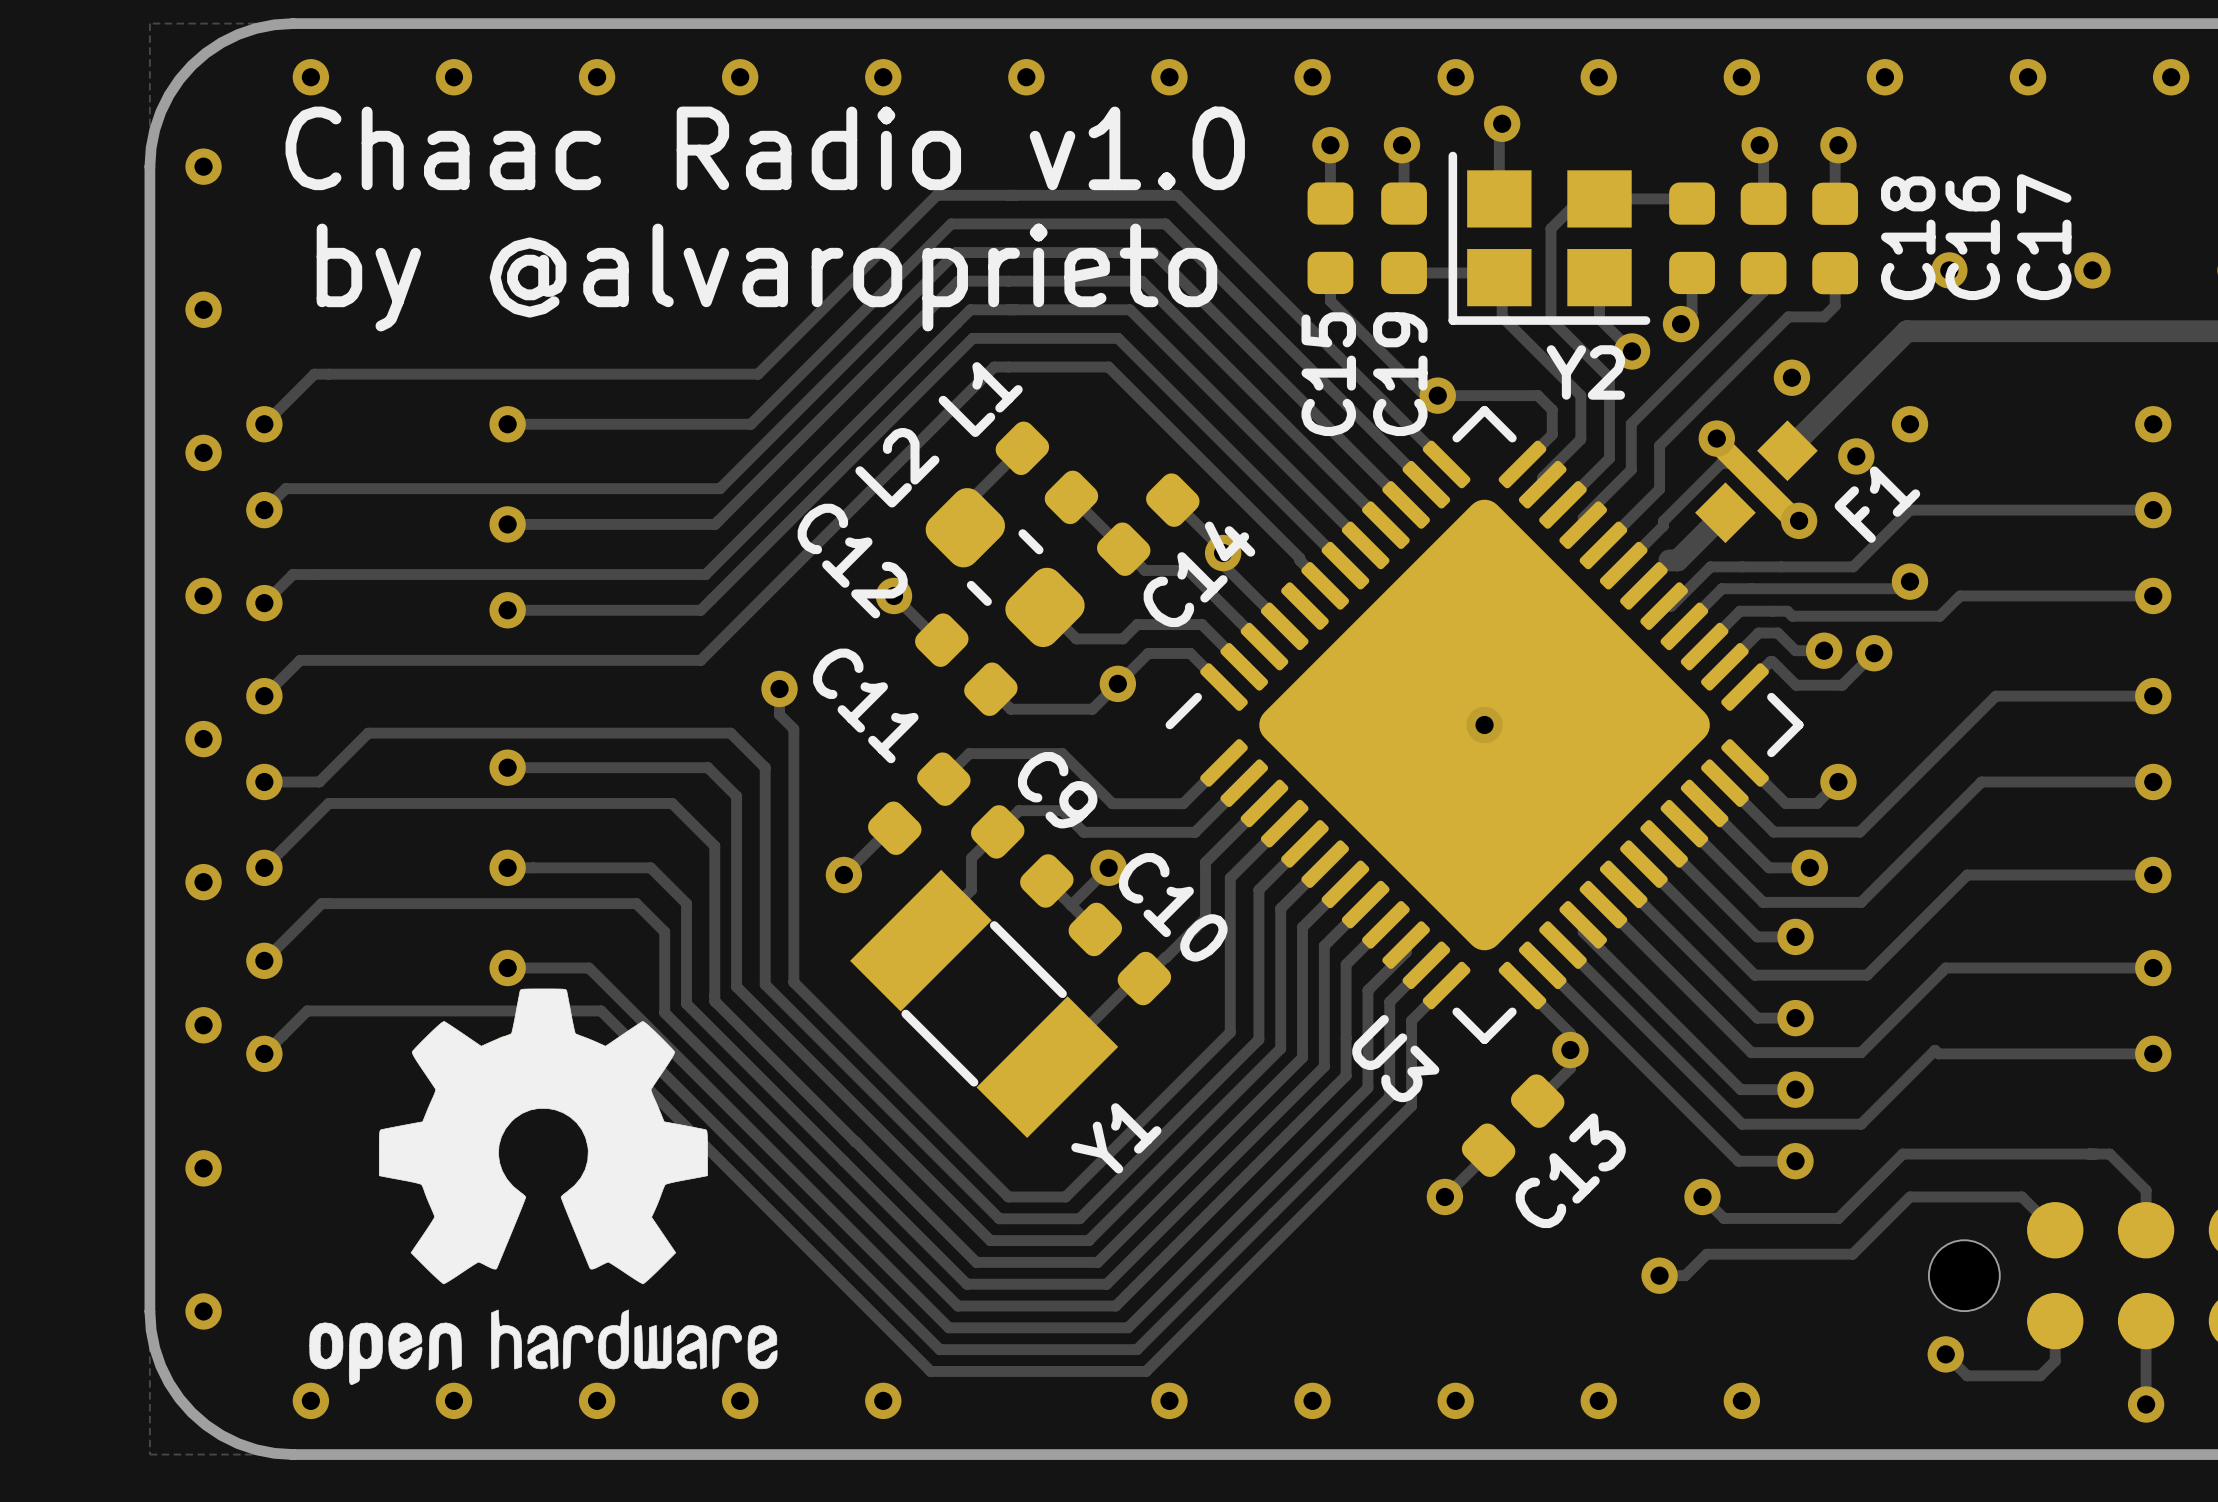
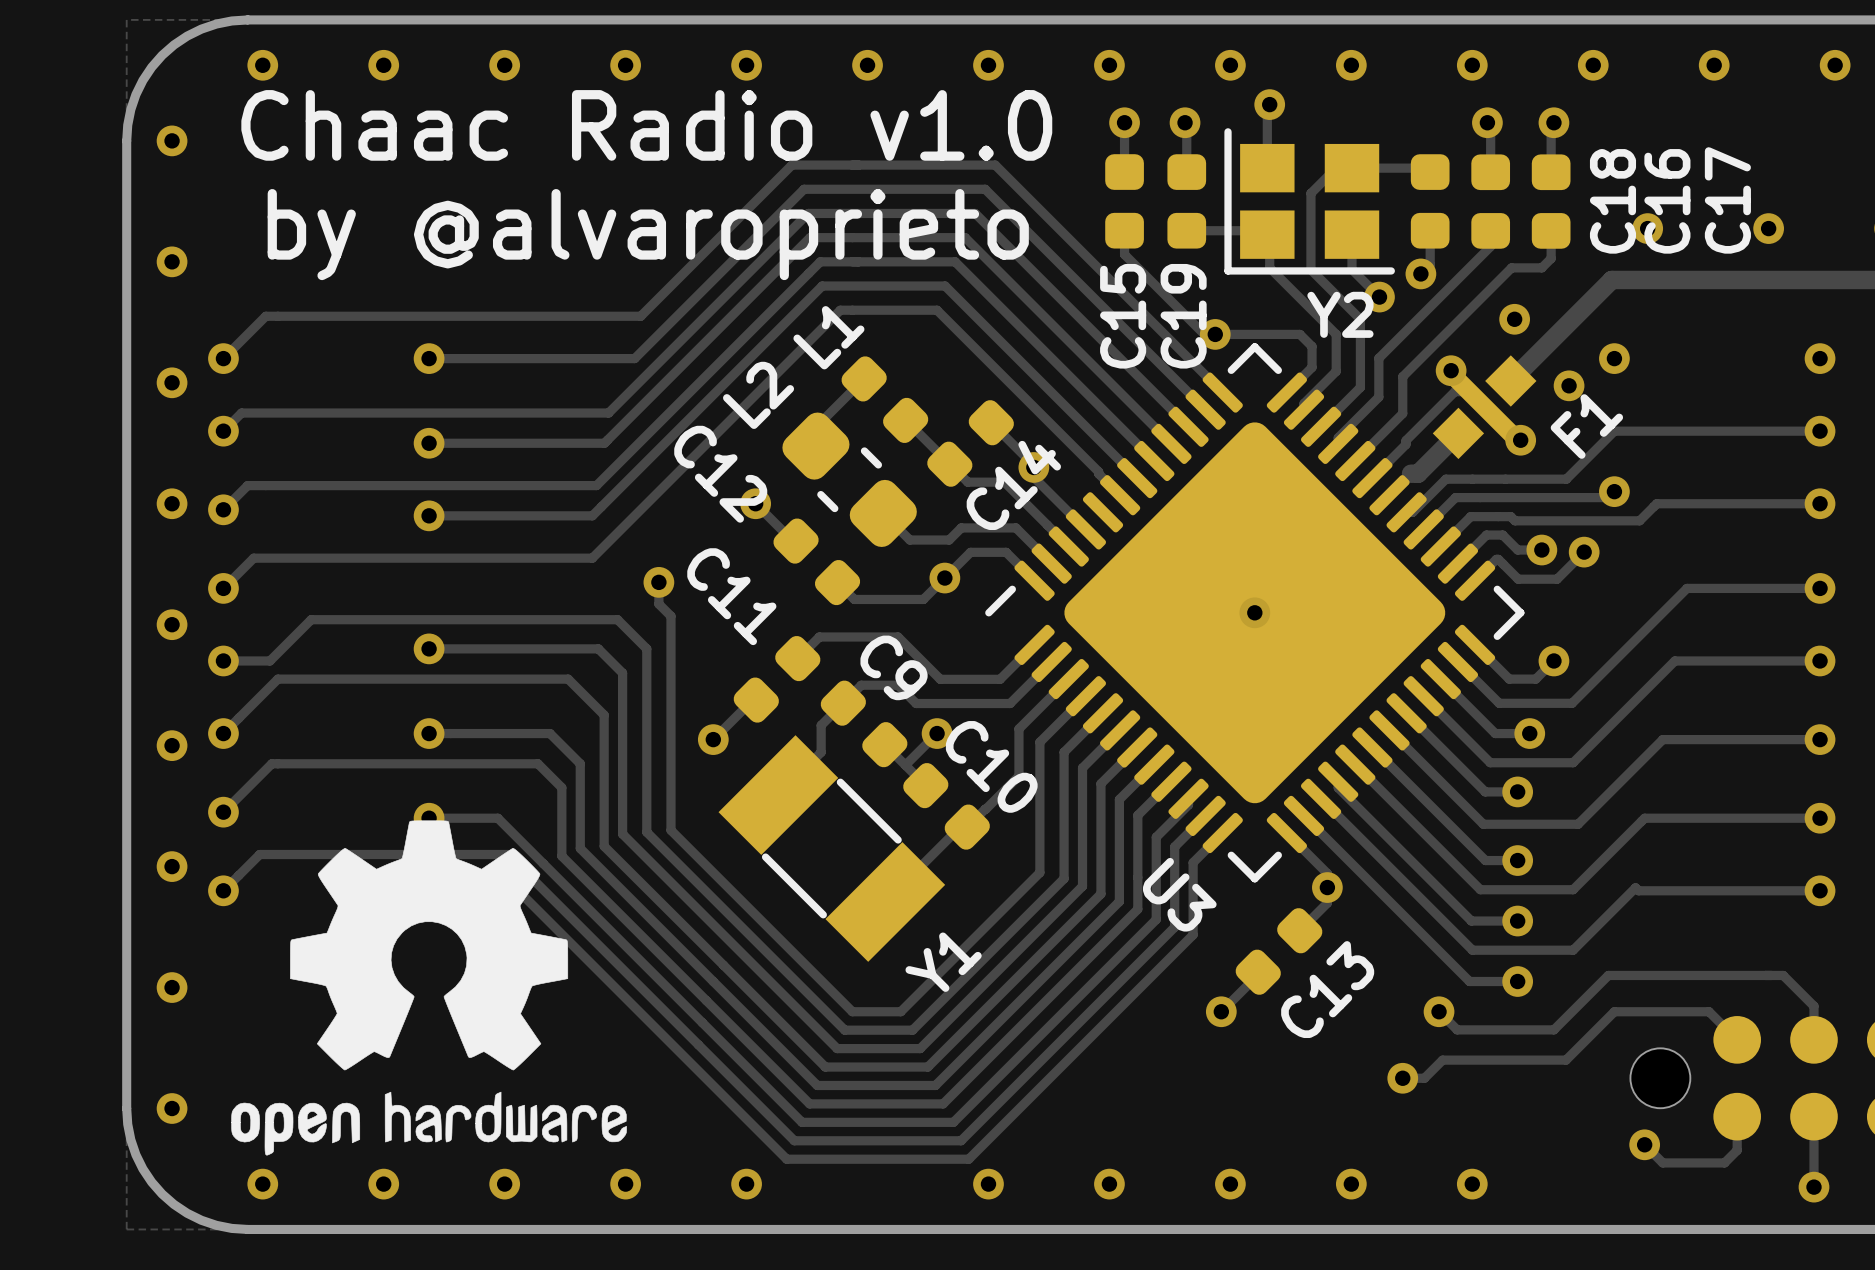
drawing position: (543, 1186) -> (429, 987)

